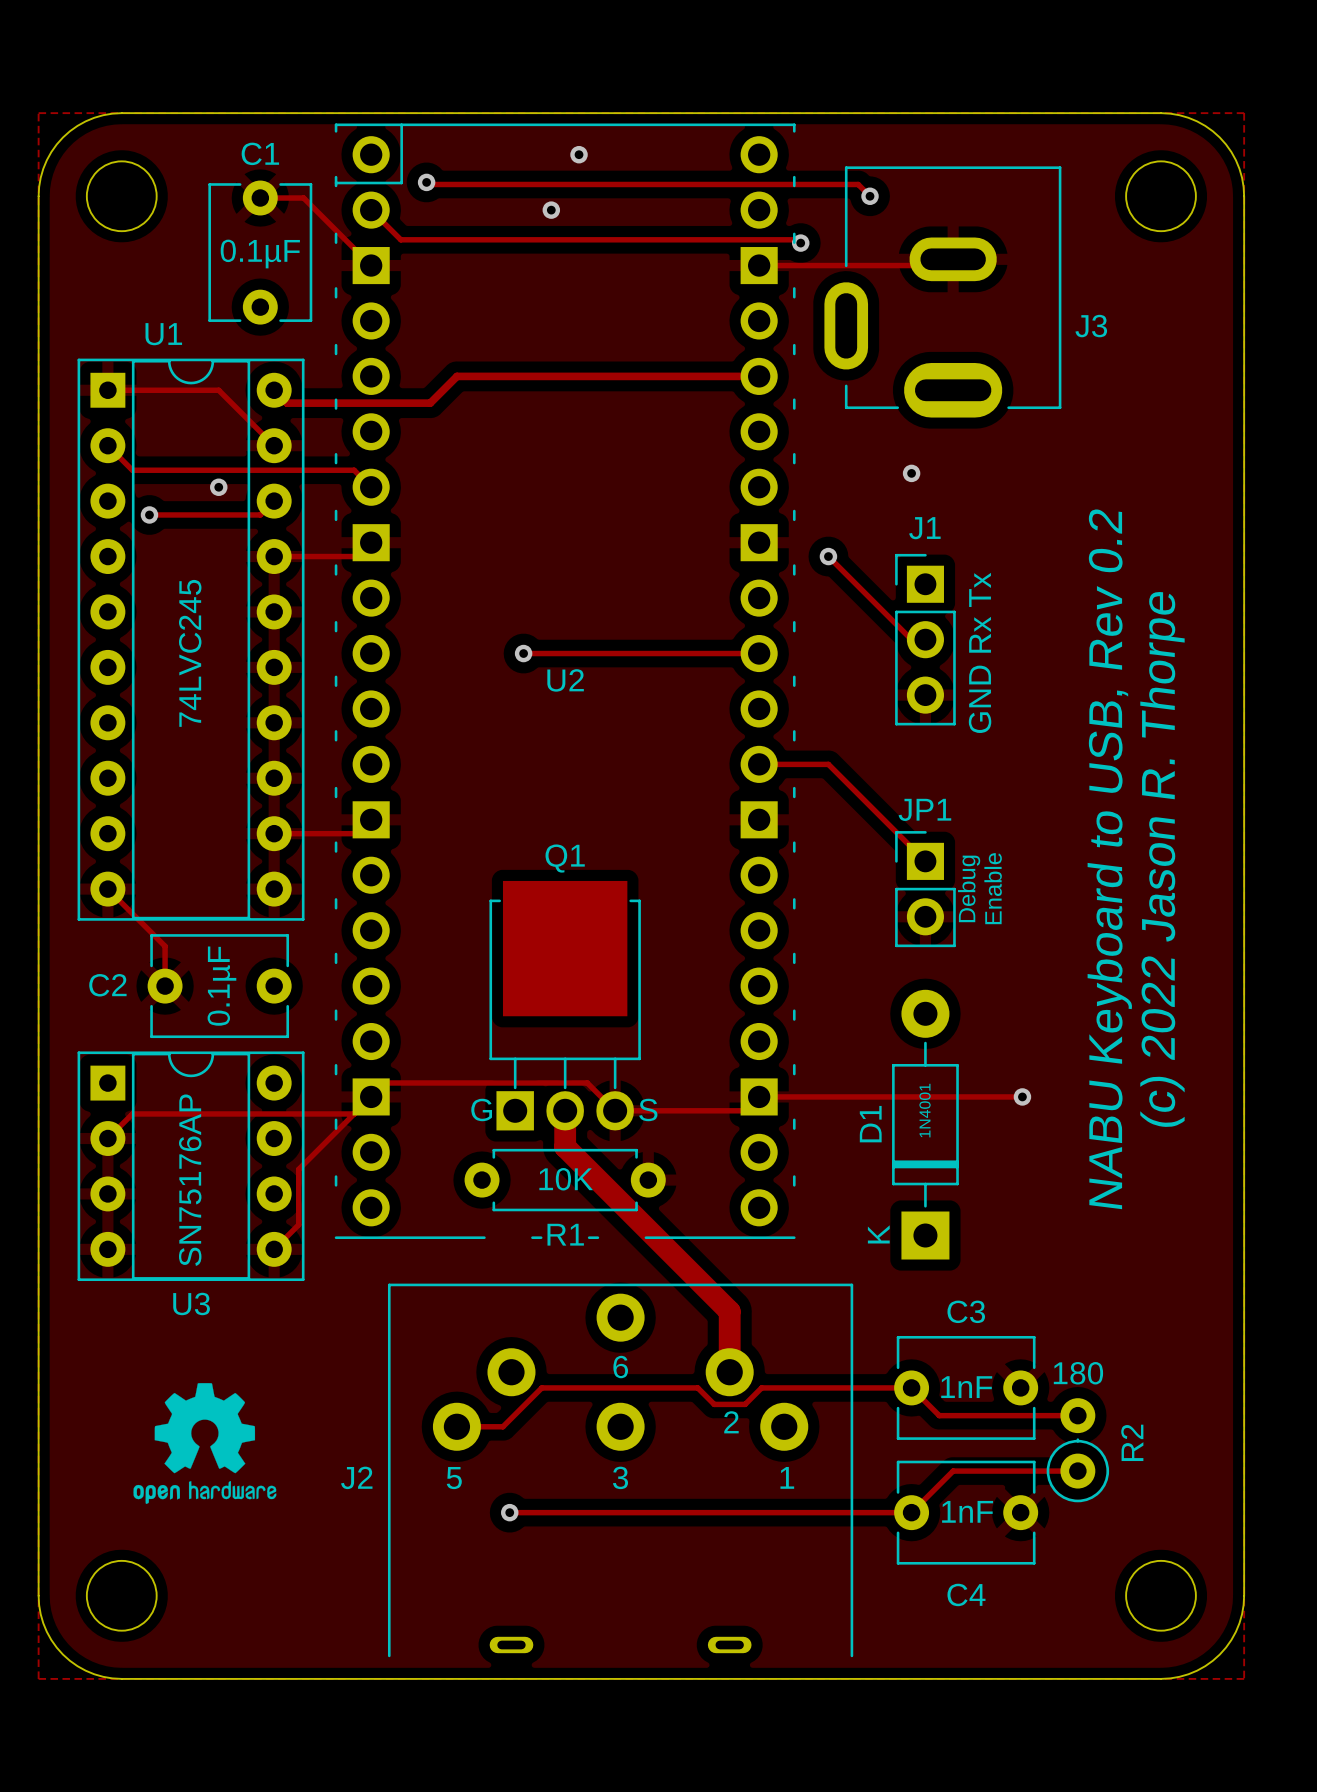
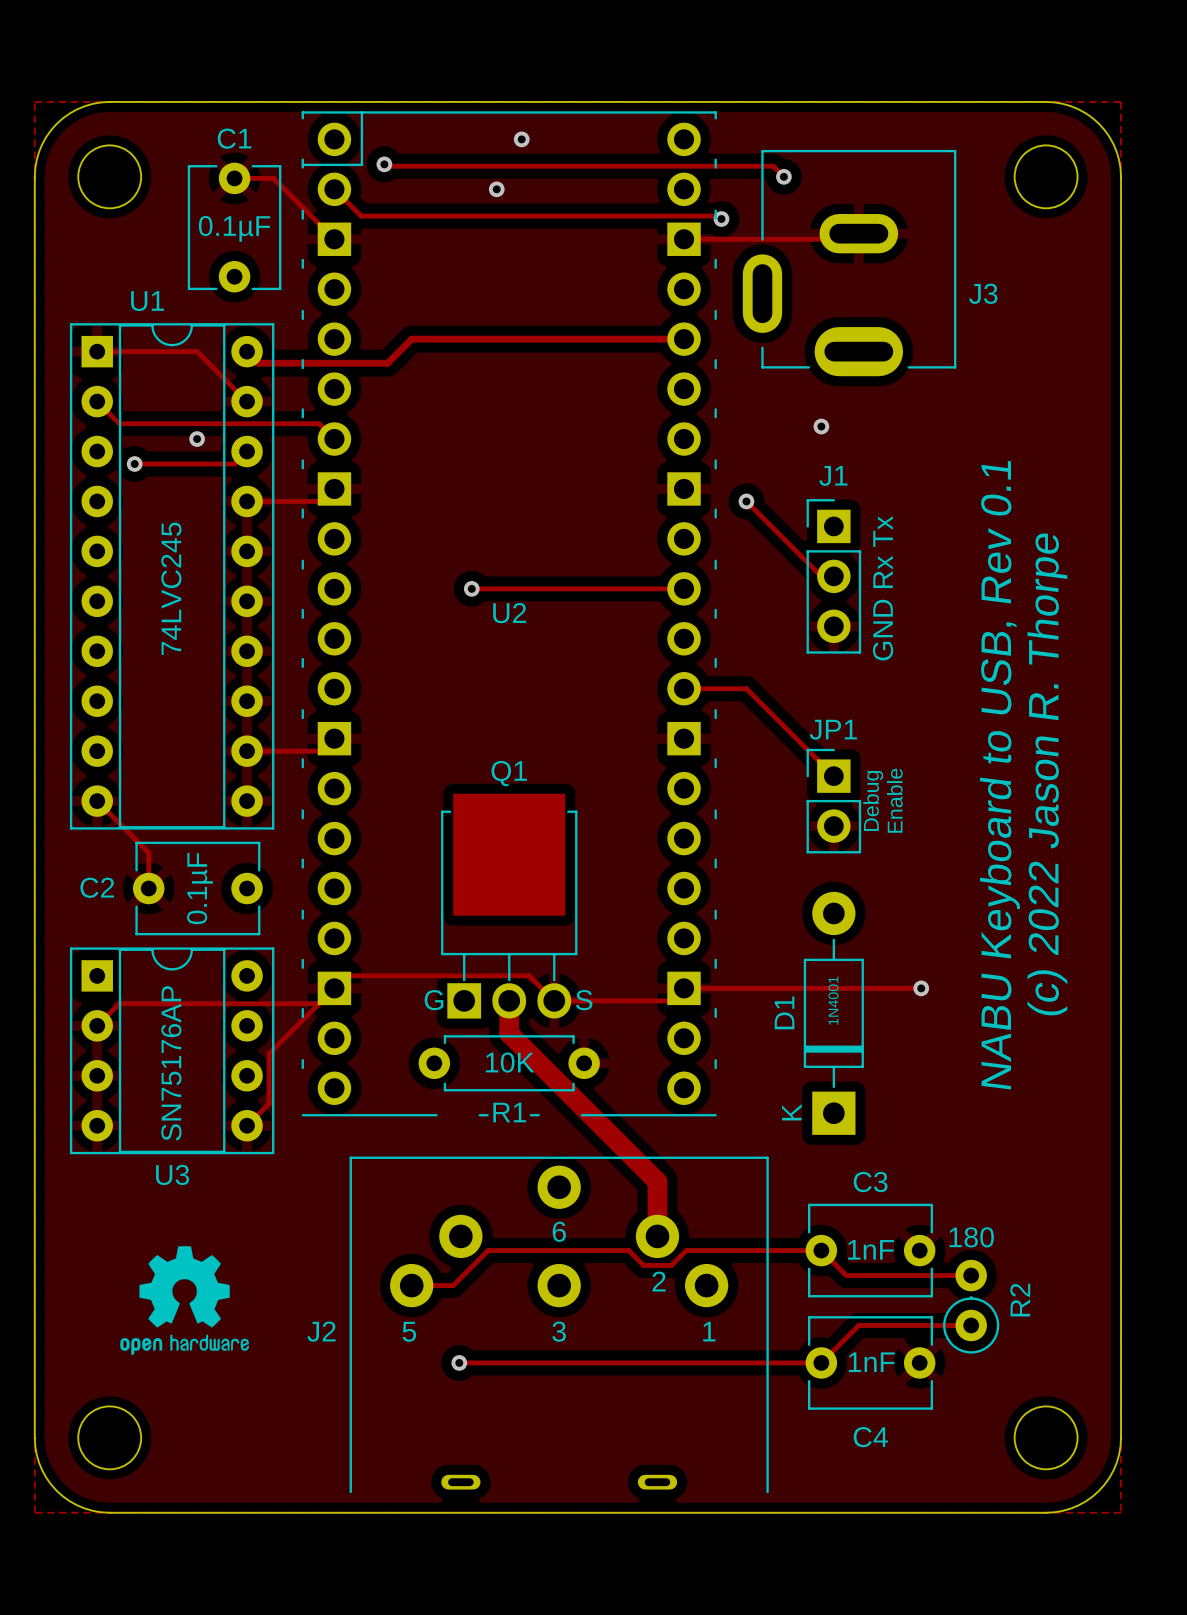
text: NABU Keyboard to USB, Rev 0.2 (1109, 859) -> NABU Keyboard to USB, Rev 0.1 (999, 775)

